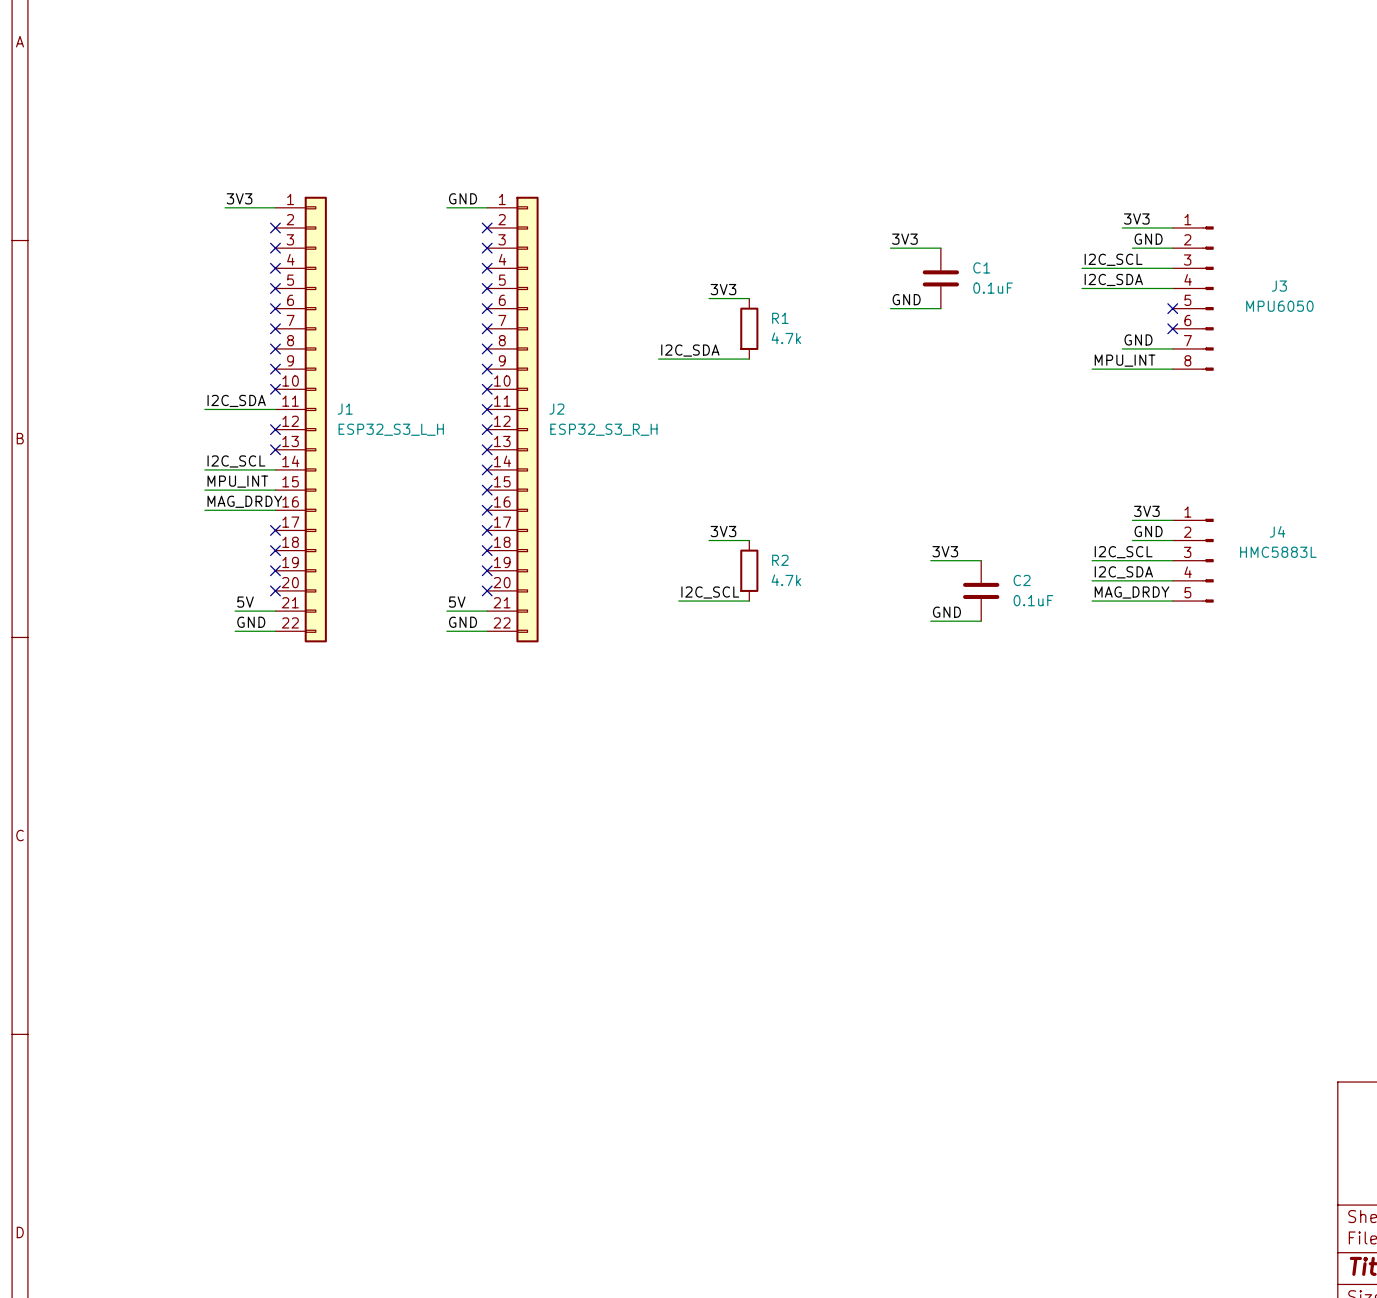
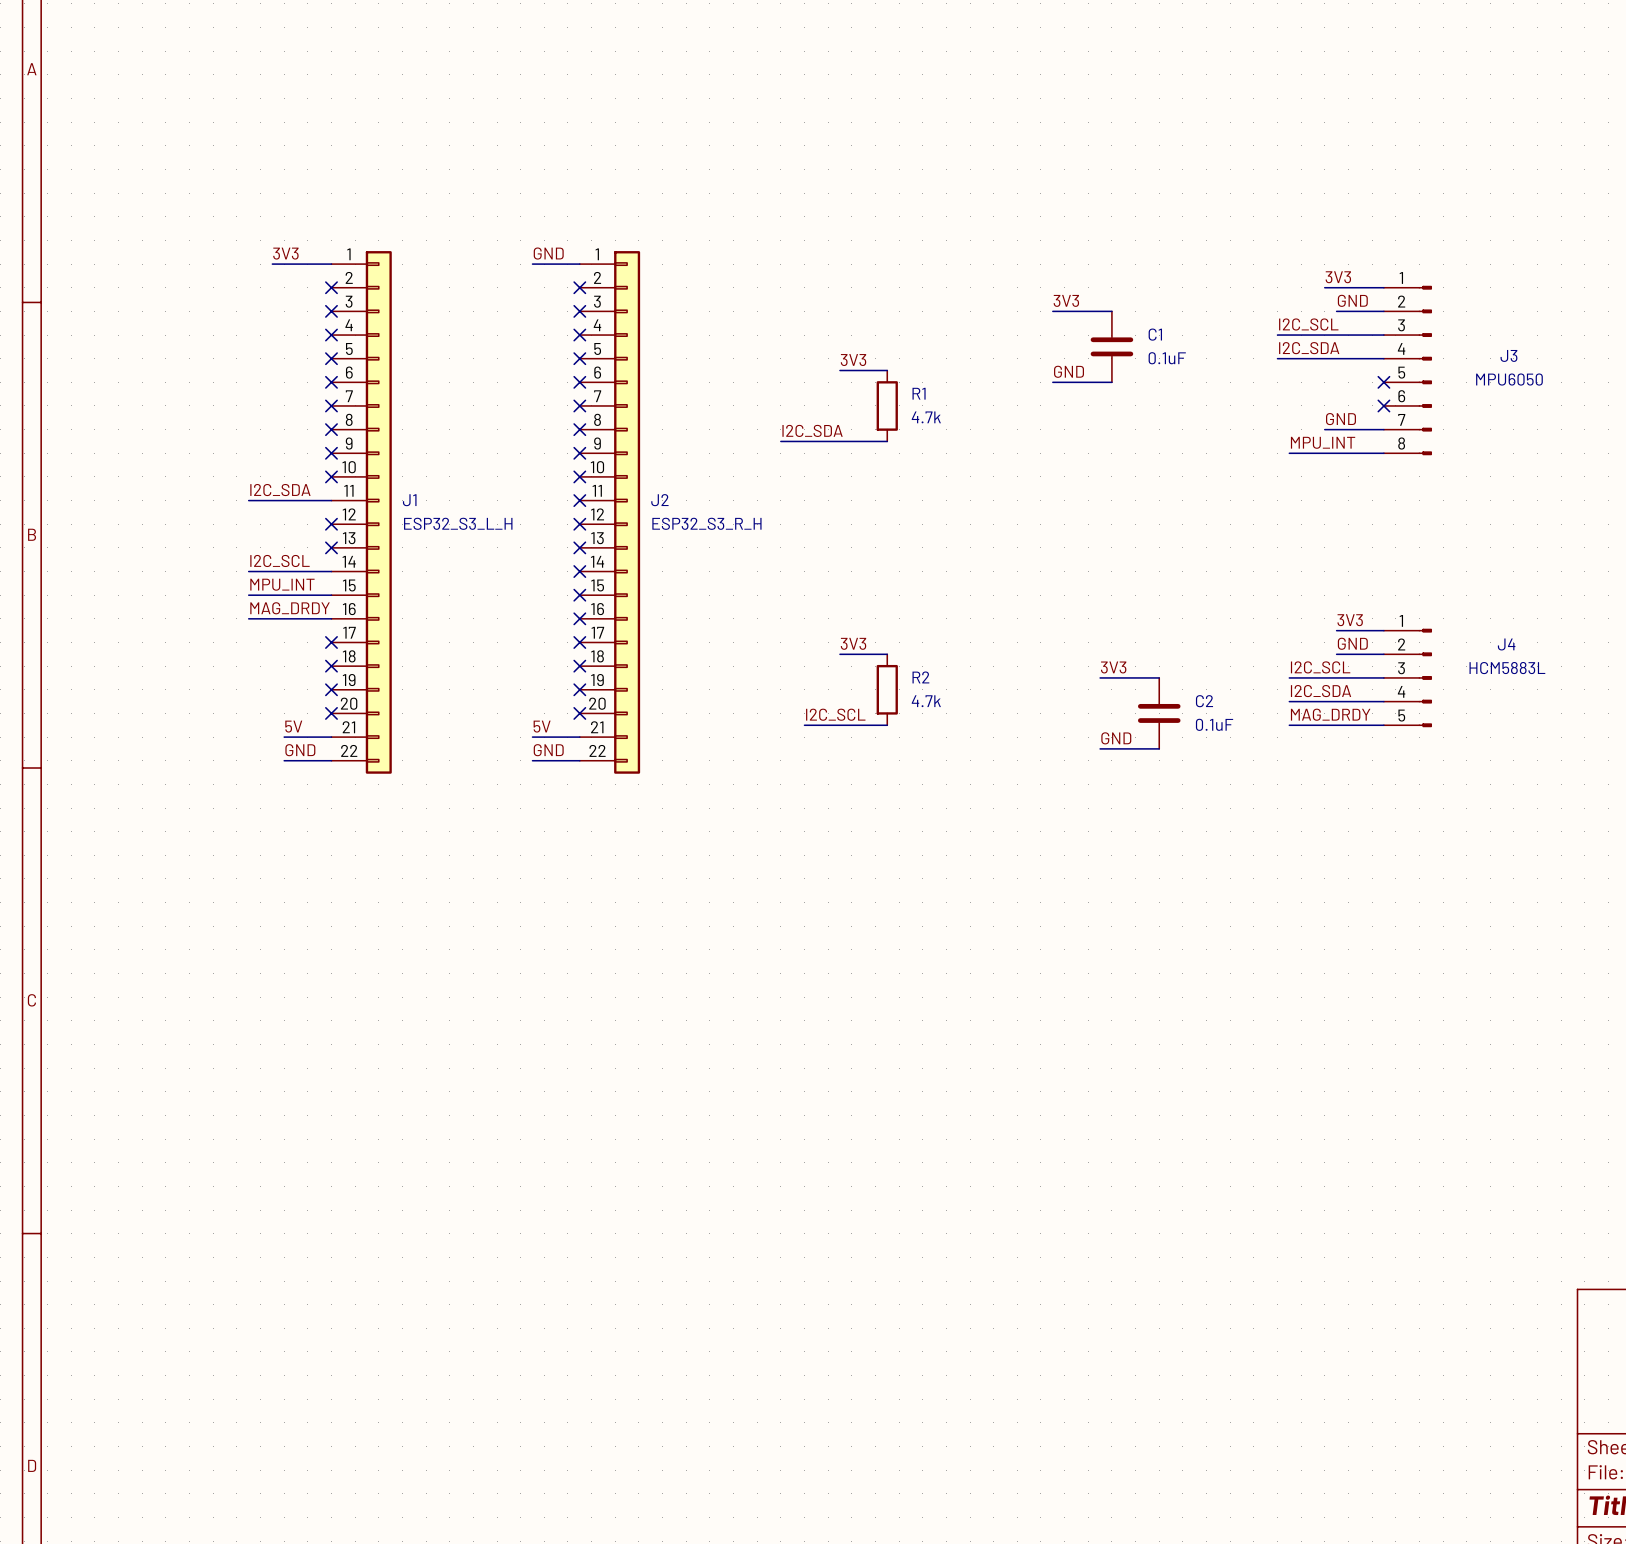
J4 value: HMC5883L (1278, 552) -> HCM5883L (1507, 668)

